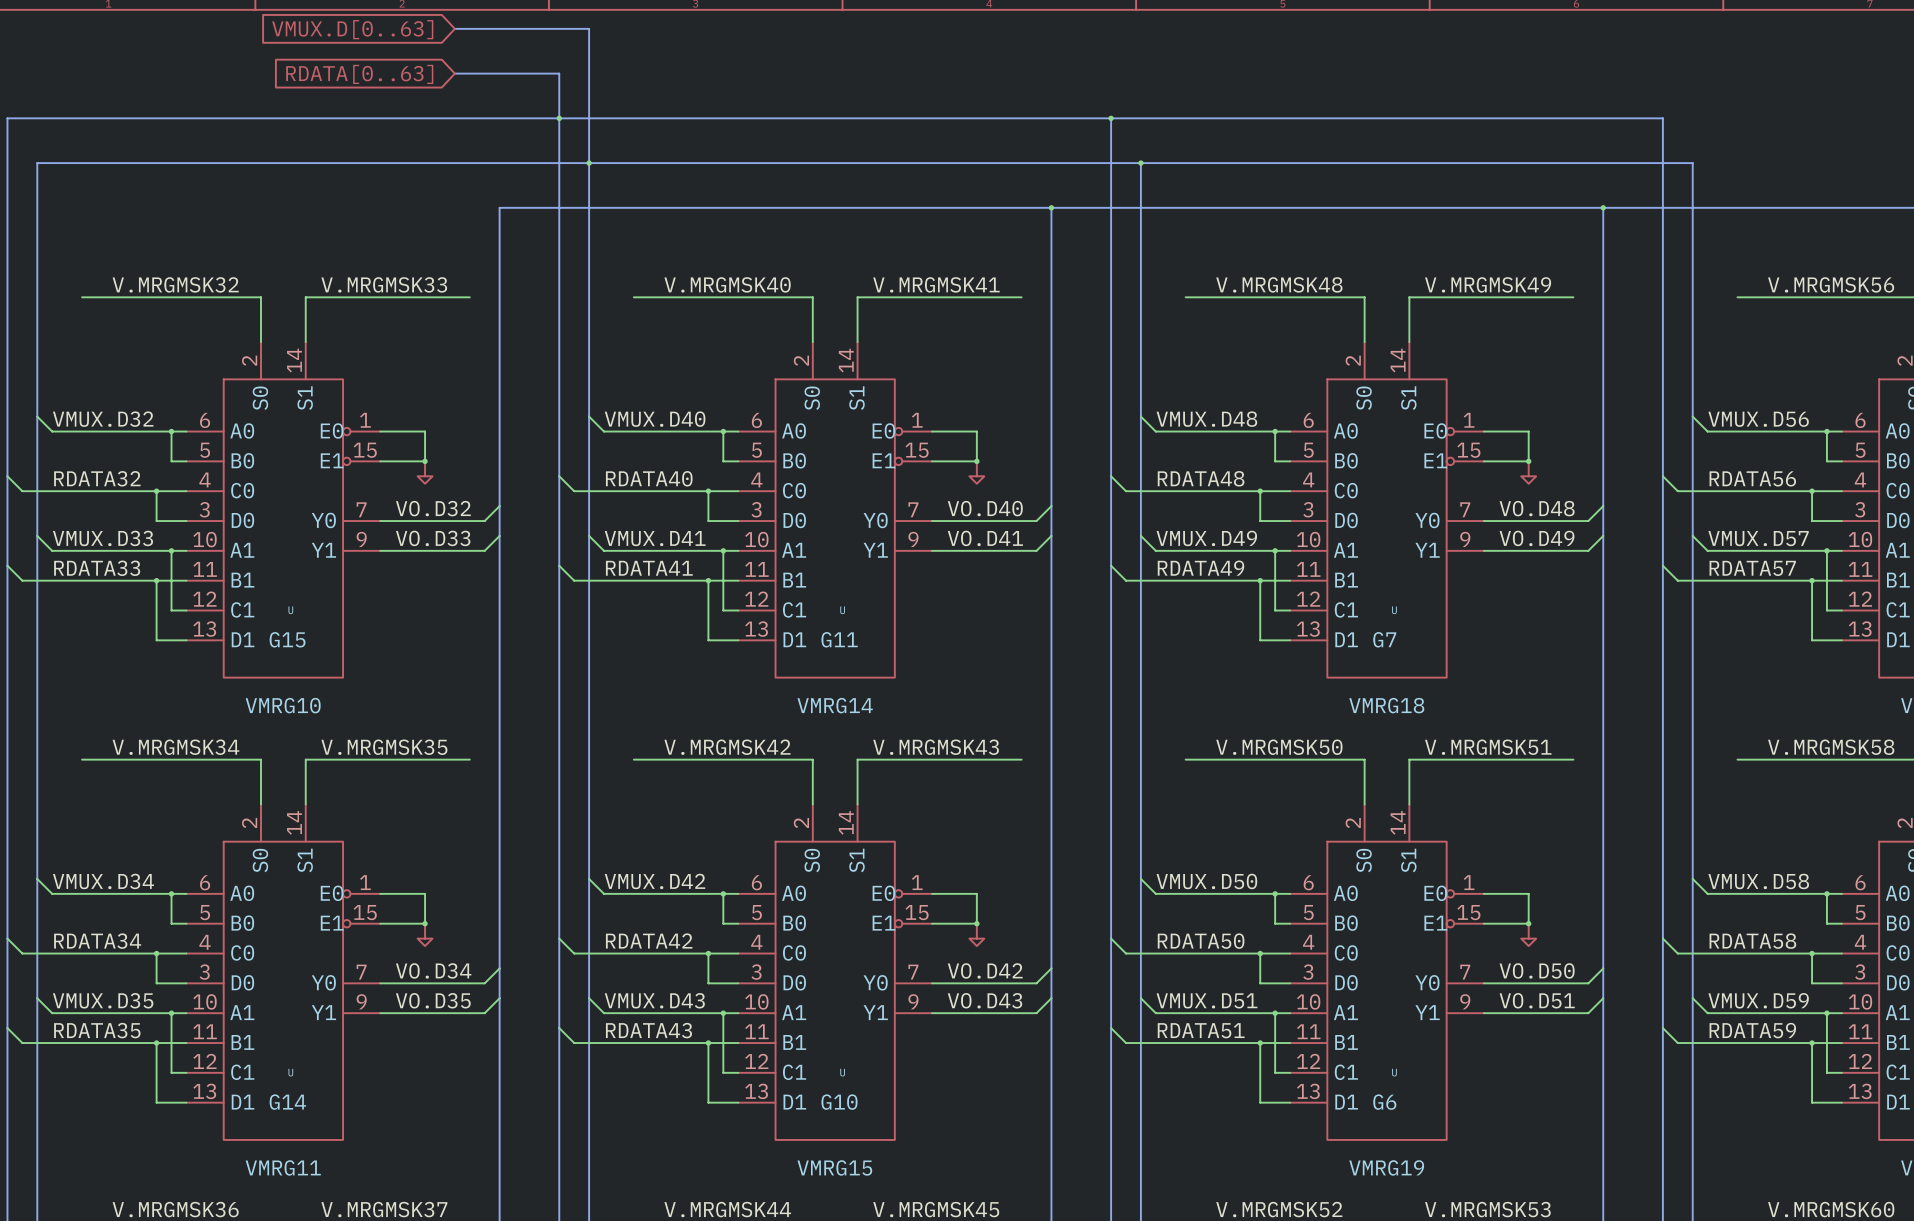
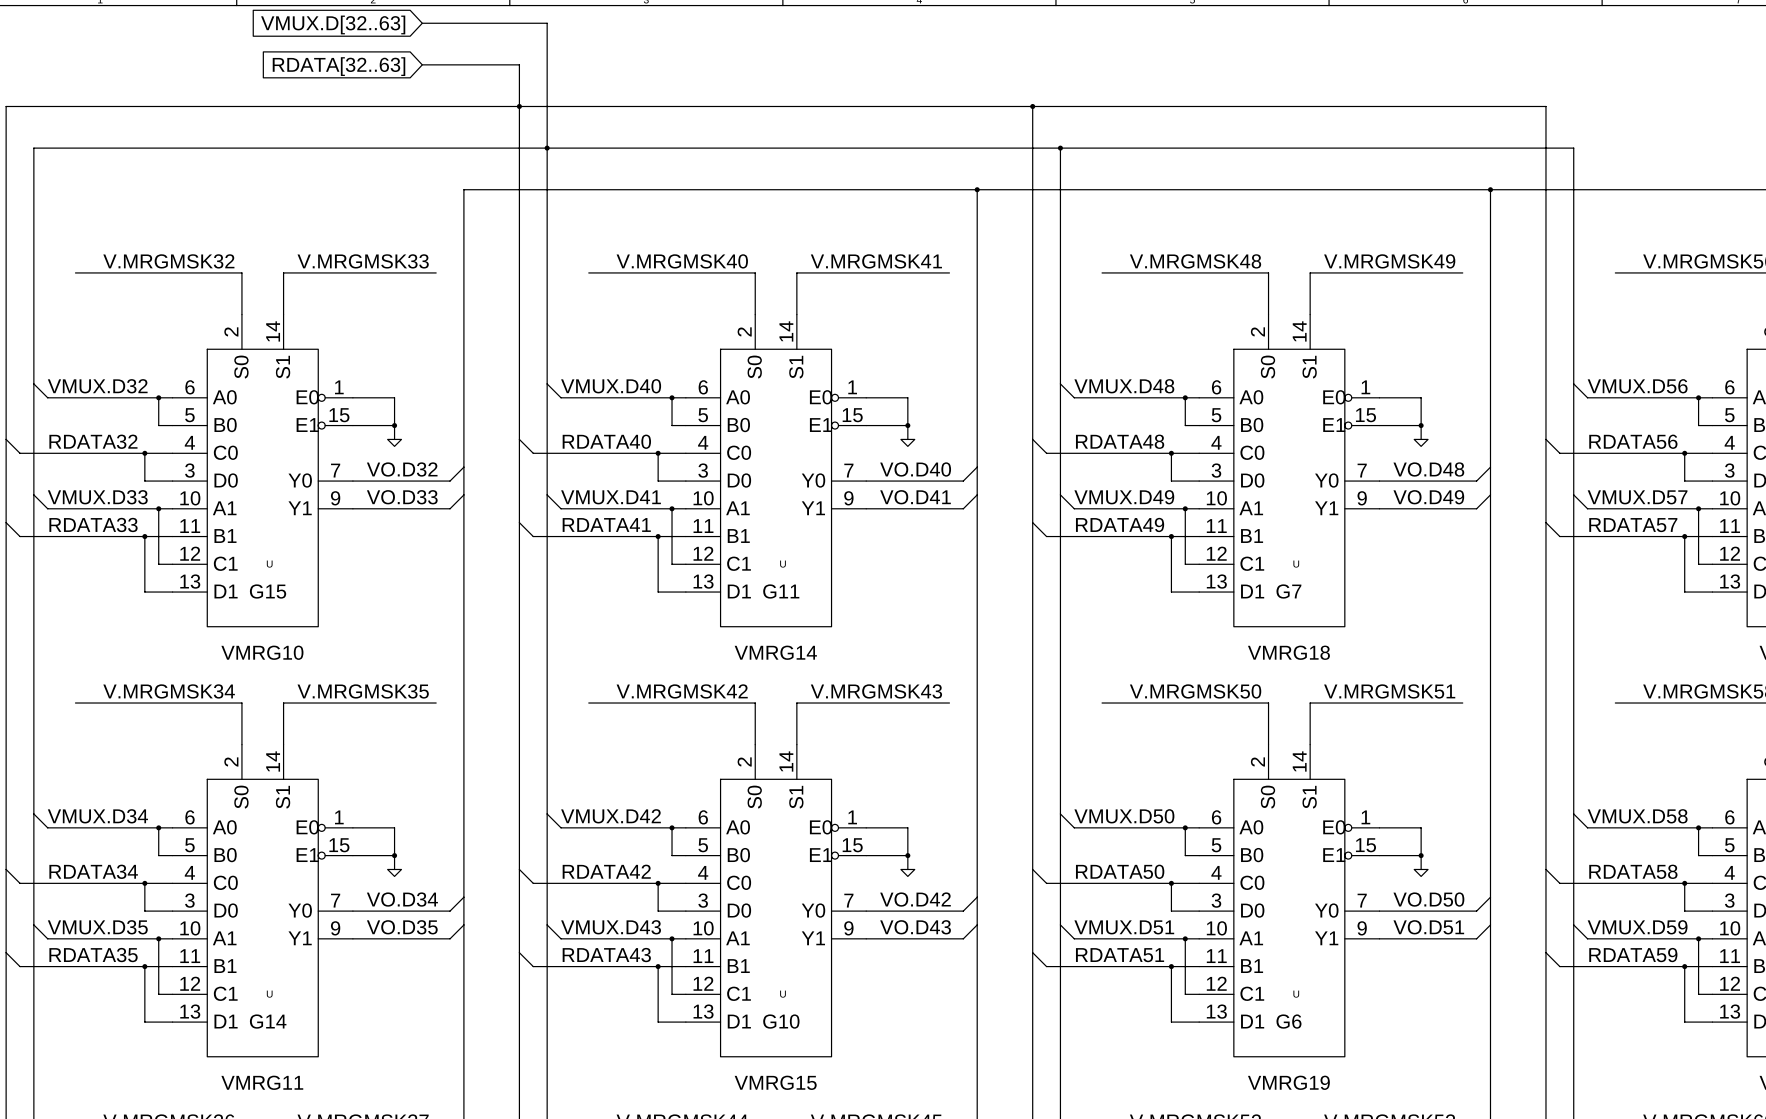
global label: VMUX.D[0..63] (352, 29) -> VMUX.D[32..63] (333, 24)
global label: RDATA[0..63] (359, 74) -> RDATA[32..63] (339, 66)

